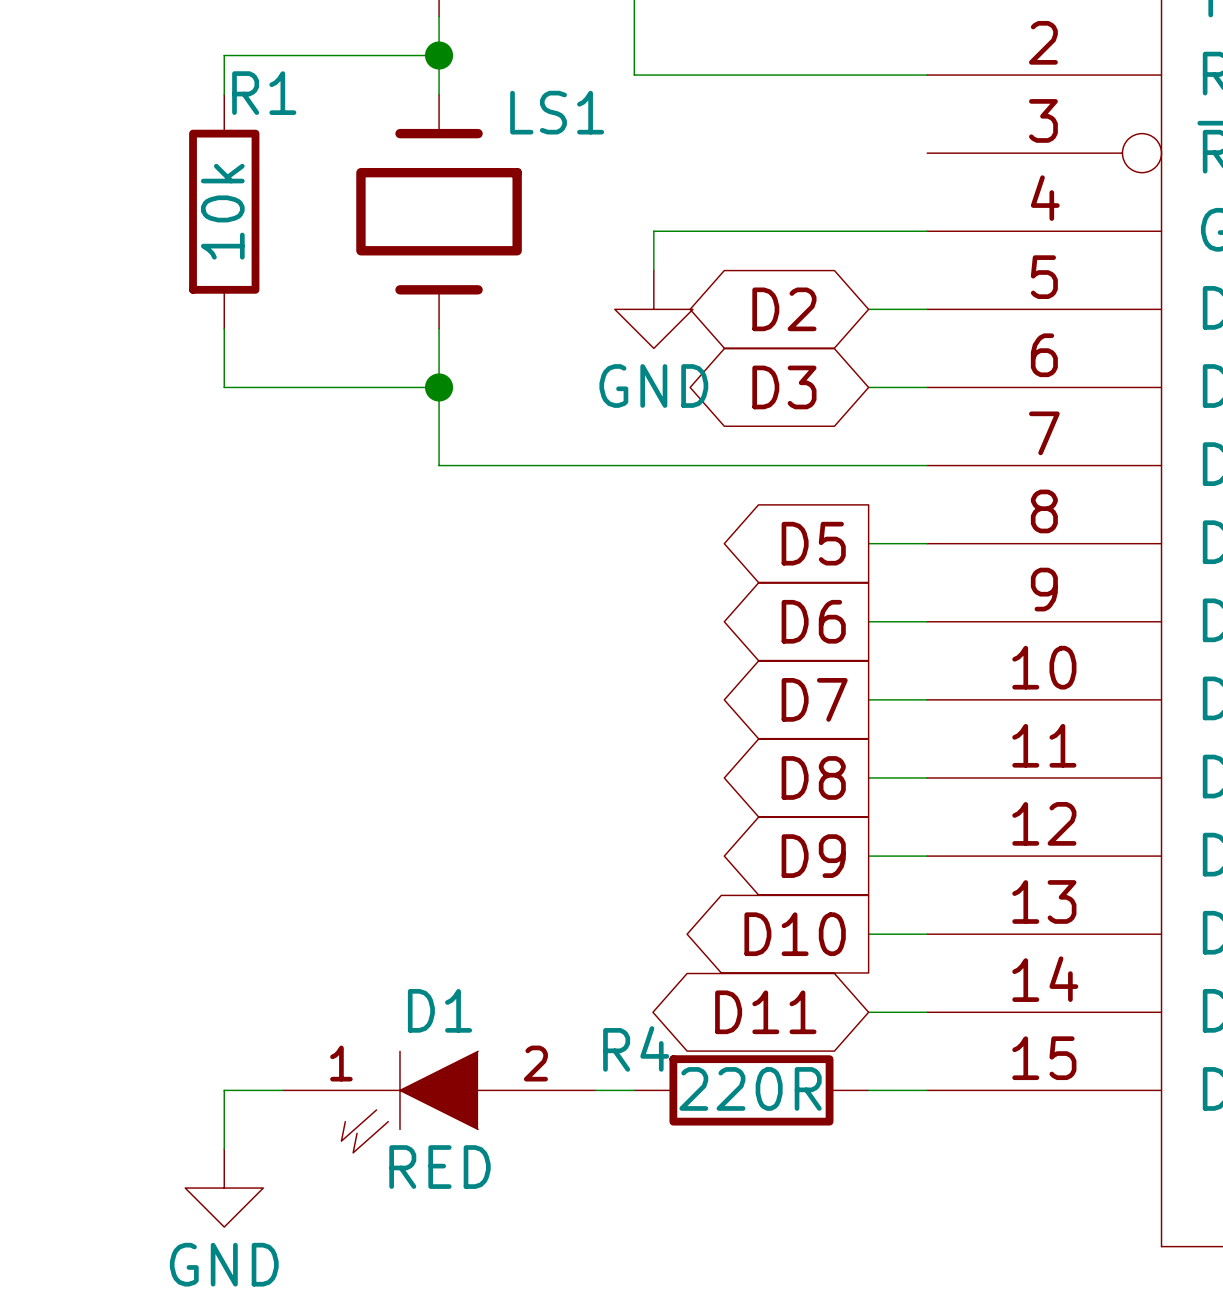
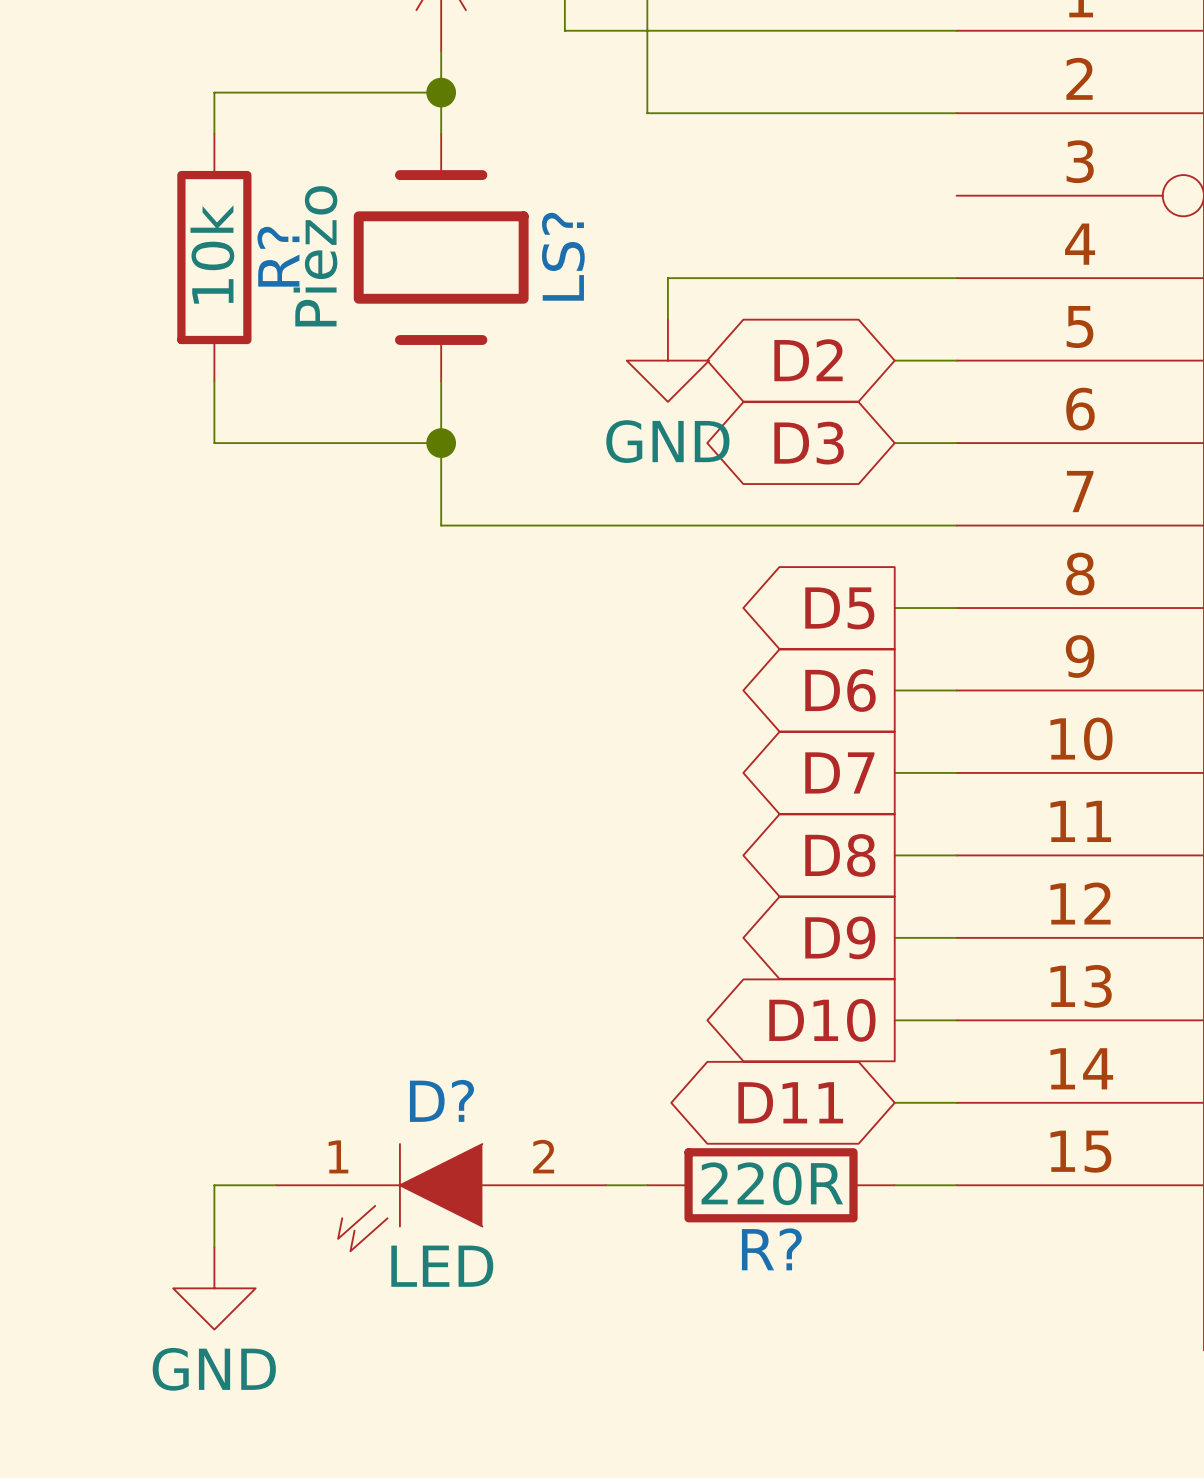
R1 name: R1 (264, 93) -> R? (278, 256)
LS1 name: LS1 (557, 112) -> LS? (563, 256)
LS1 value: none -> Piezo (315, 256)
D1 name: D1 (439, 1010) -> D? (441, 1100)
R4 name: R4 (636, 1048) -> R? (771, 1249)
D1 value: RED (439, 1167) -> LED (442, 1266)

